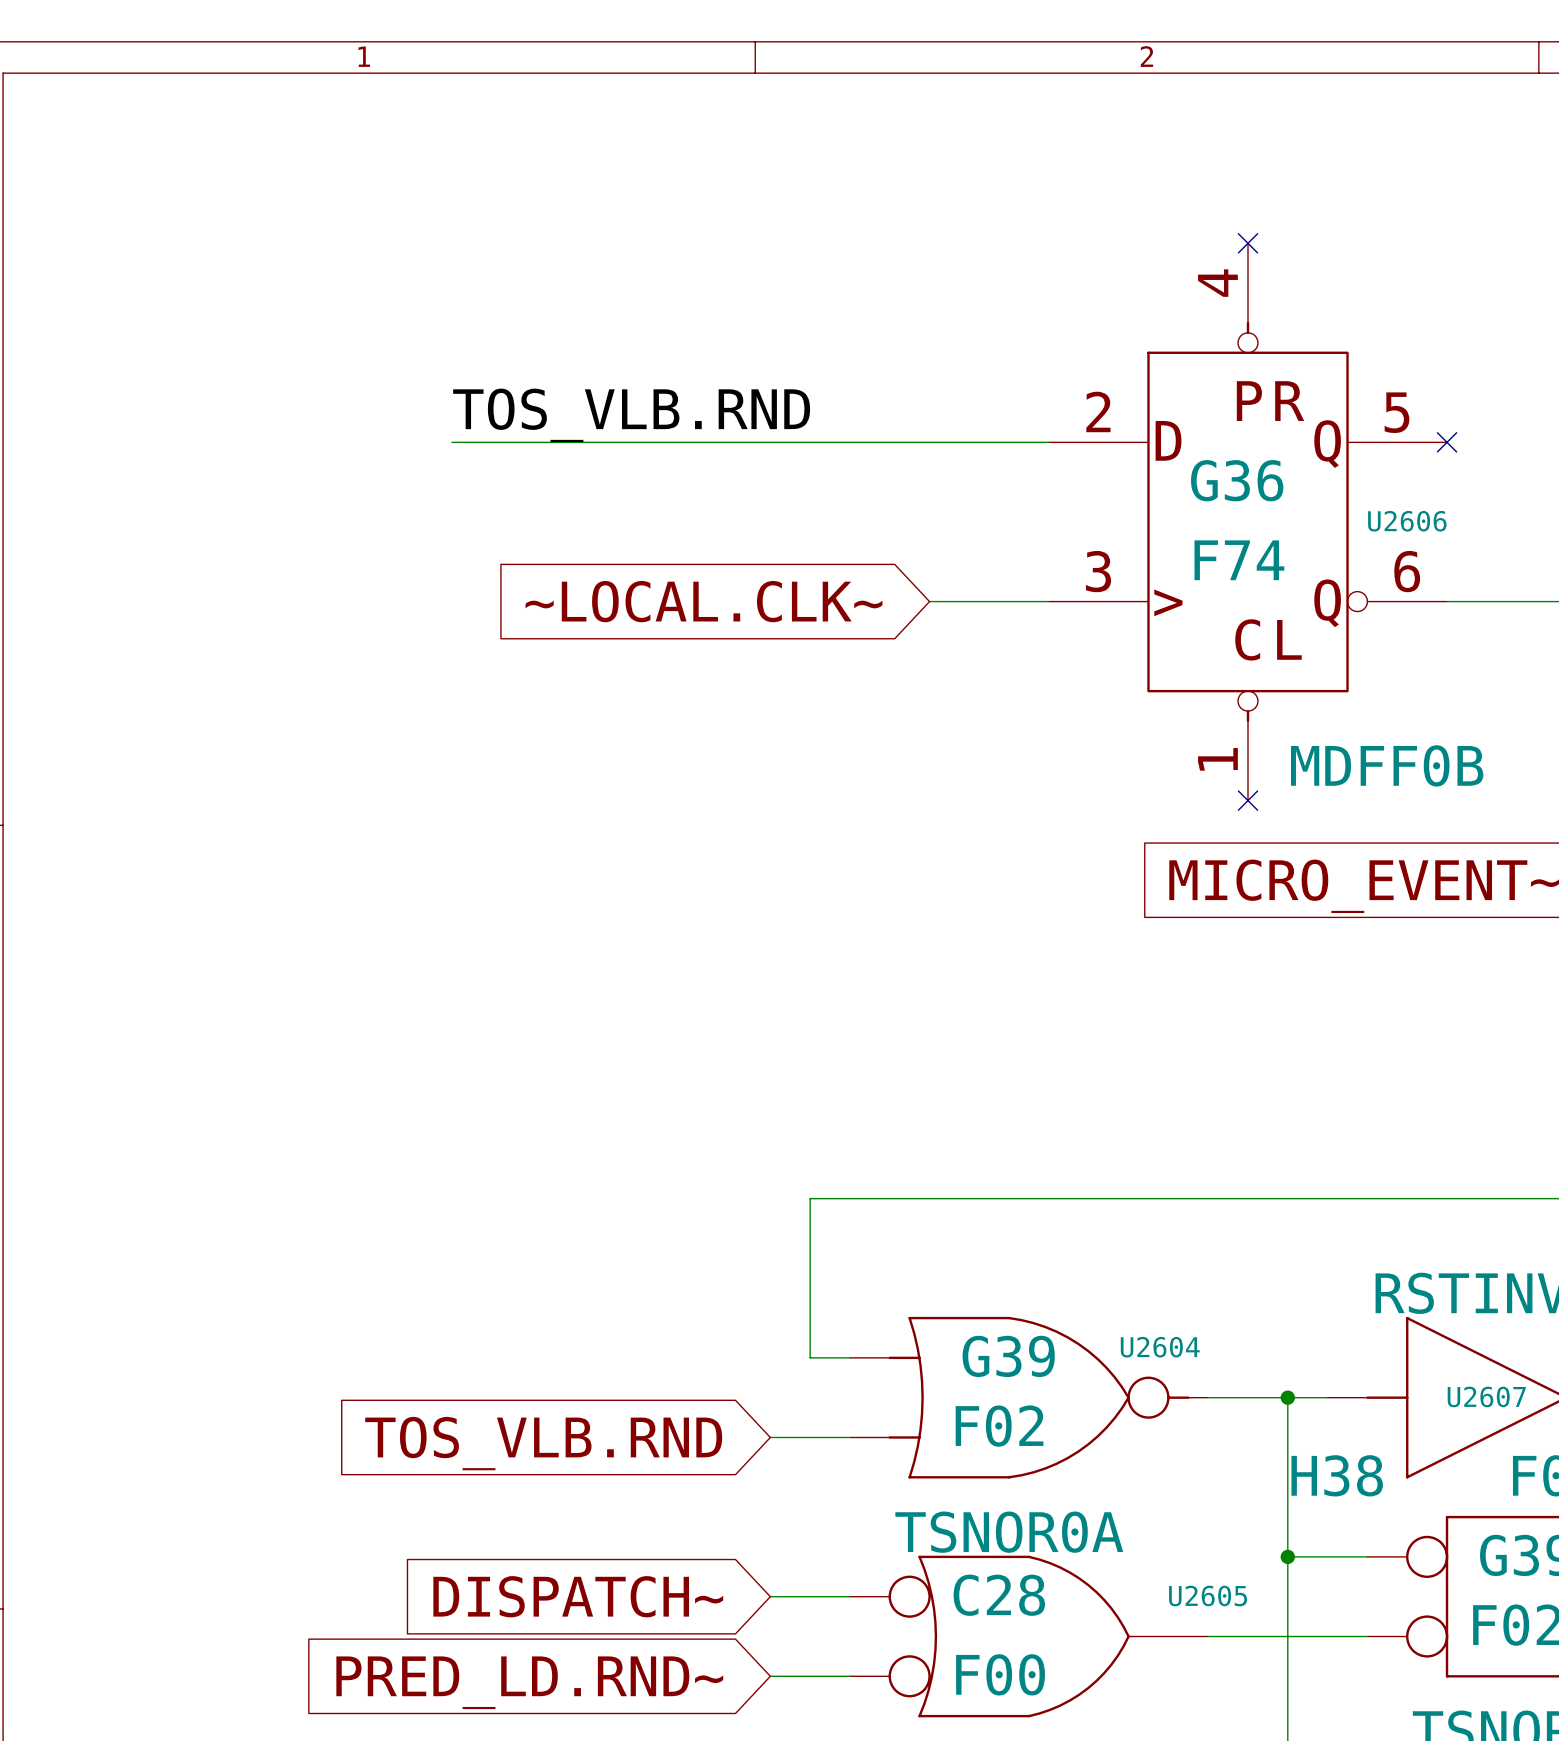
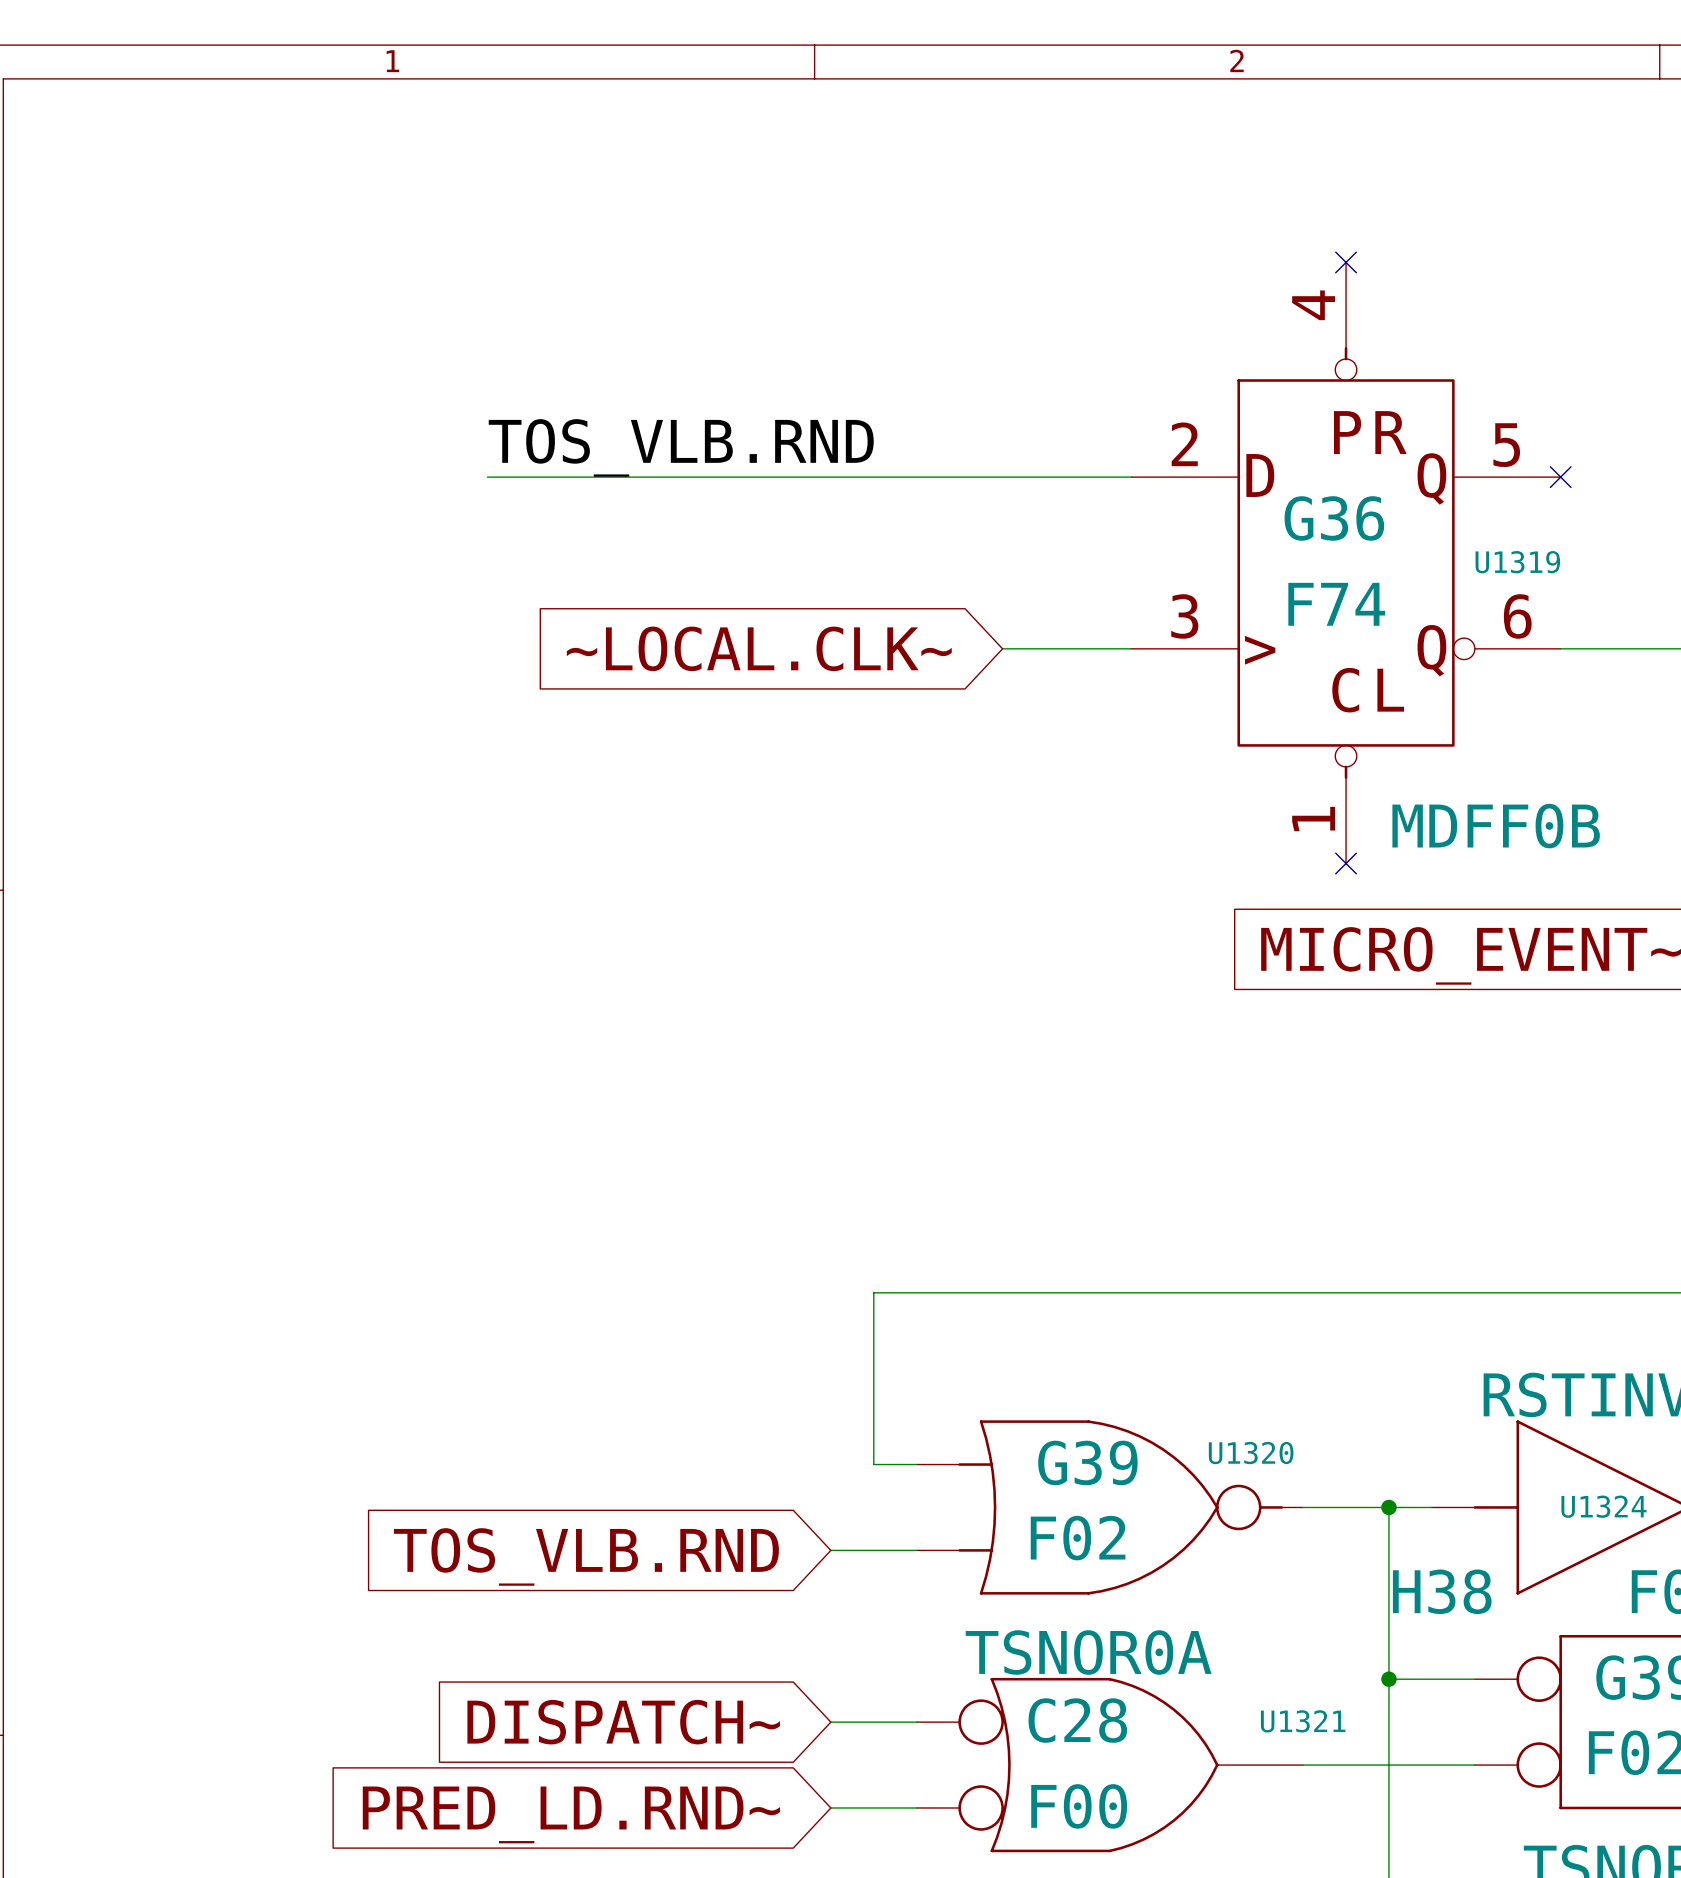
U2606 name: U2606 (1407, 521) -> U1319 (1517, 562)
U2604 name: U2604 (1160, 1347) -> U1320 (1251, 1453)
U2607 name: U2607 (1486, 1396) -> U1324 (1603, 1506)
U2605 name: U2605 (1208, 1595) -> U1321 (1303, 1721)

